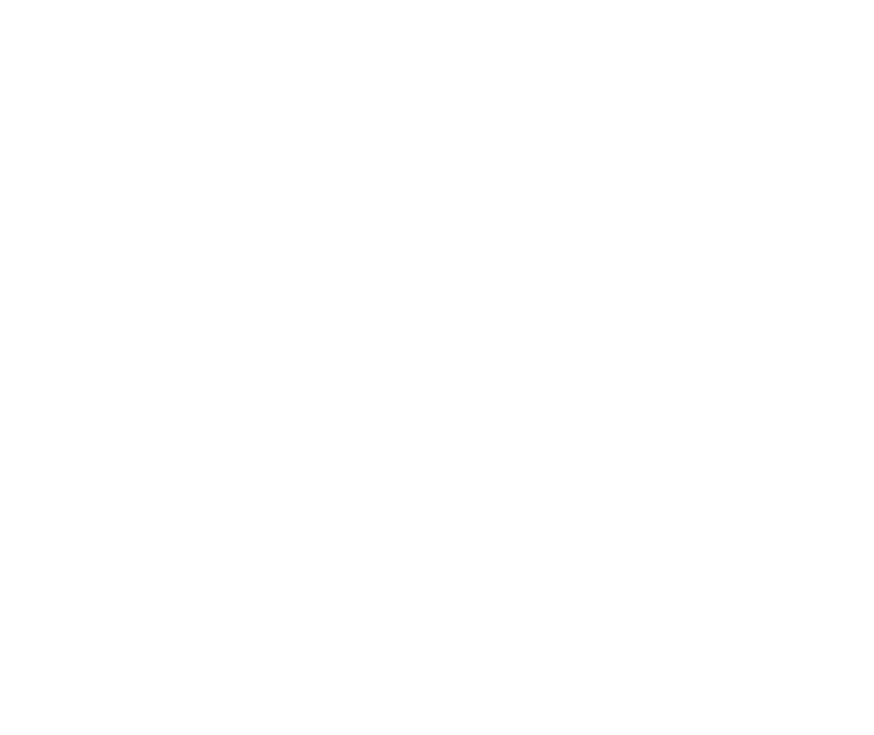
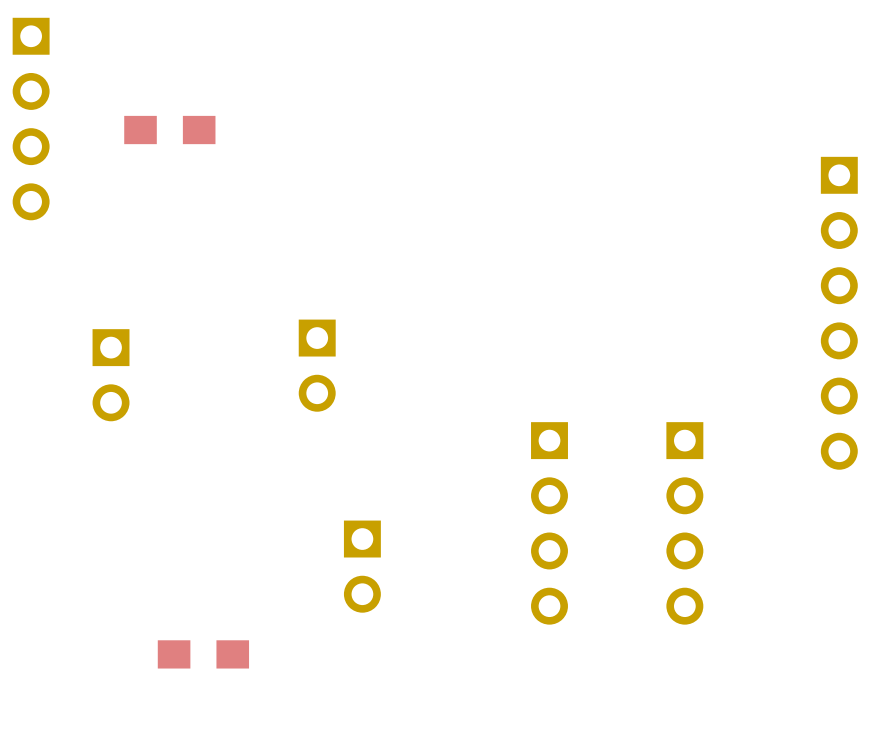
part: none -> (31, 119)
part: none -> (169, 130)
part: none -> (839, 313)
part: none -> (317, 365)
part: none -> (111, 375)
part: none -> (549, 523)
part: none -> (684, 523)
part: none -> (362, 566)
part: none -> (203, 654)

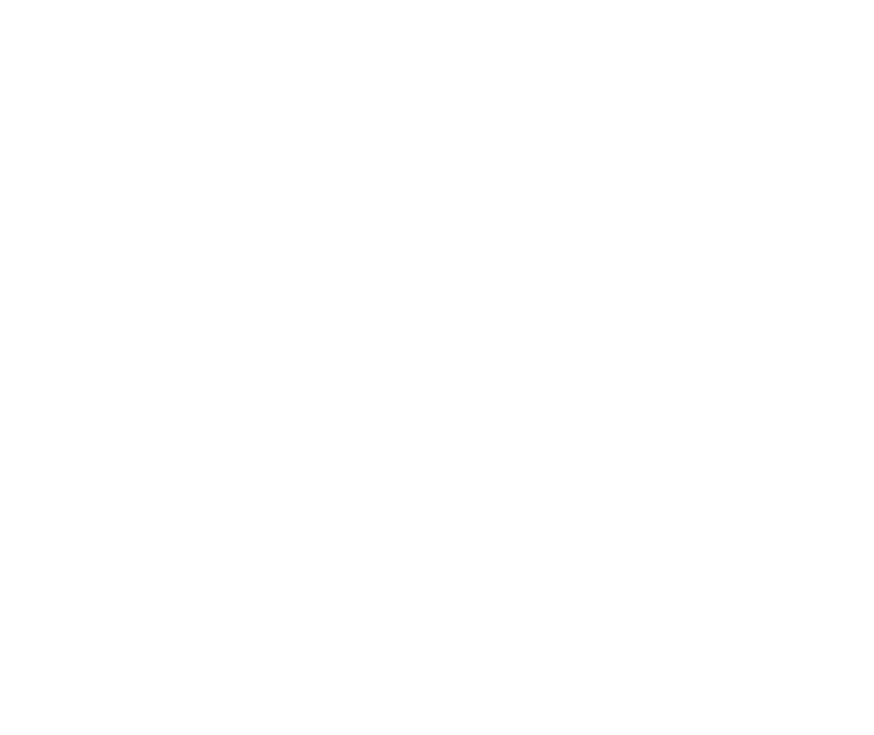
part: (31, 119) -> none
part: (169, 130) -> none
part: (839, 313) -> none
part: (317, 365) -> none
part: (111, 375) -> none
part: (549, 523) -> none
part: (684, 523) -> none
part: (362, 566) -> none
part: (203, 654) -> none

